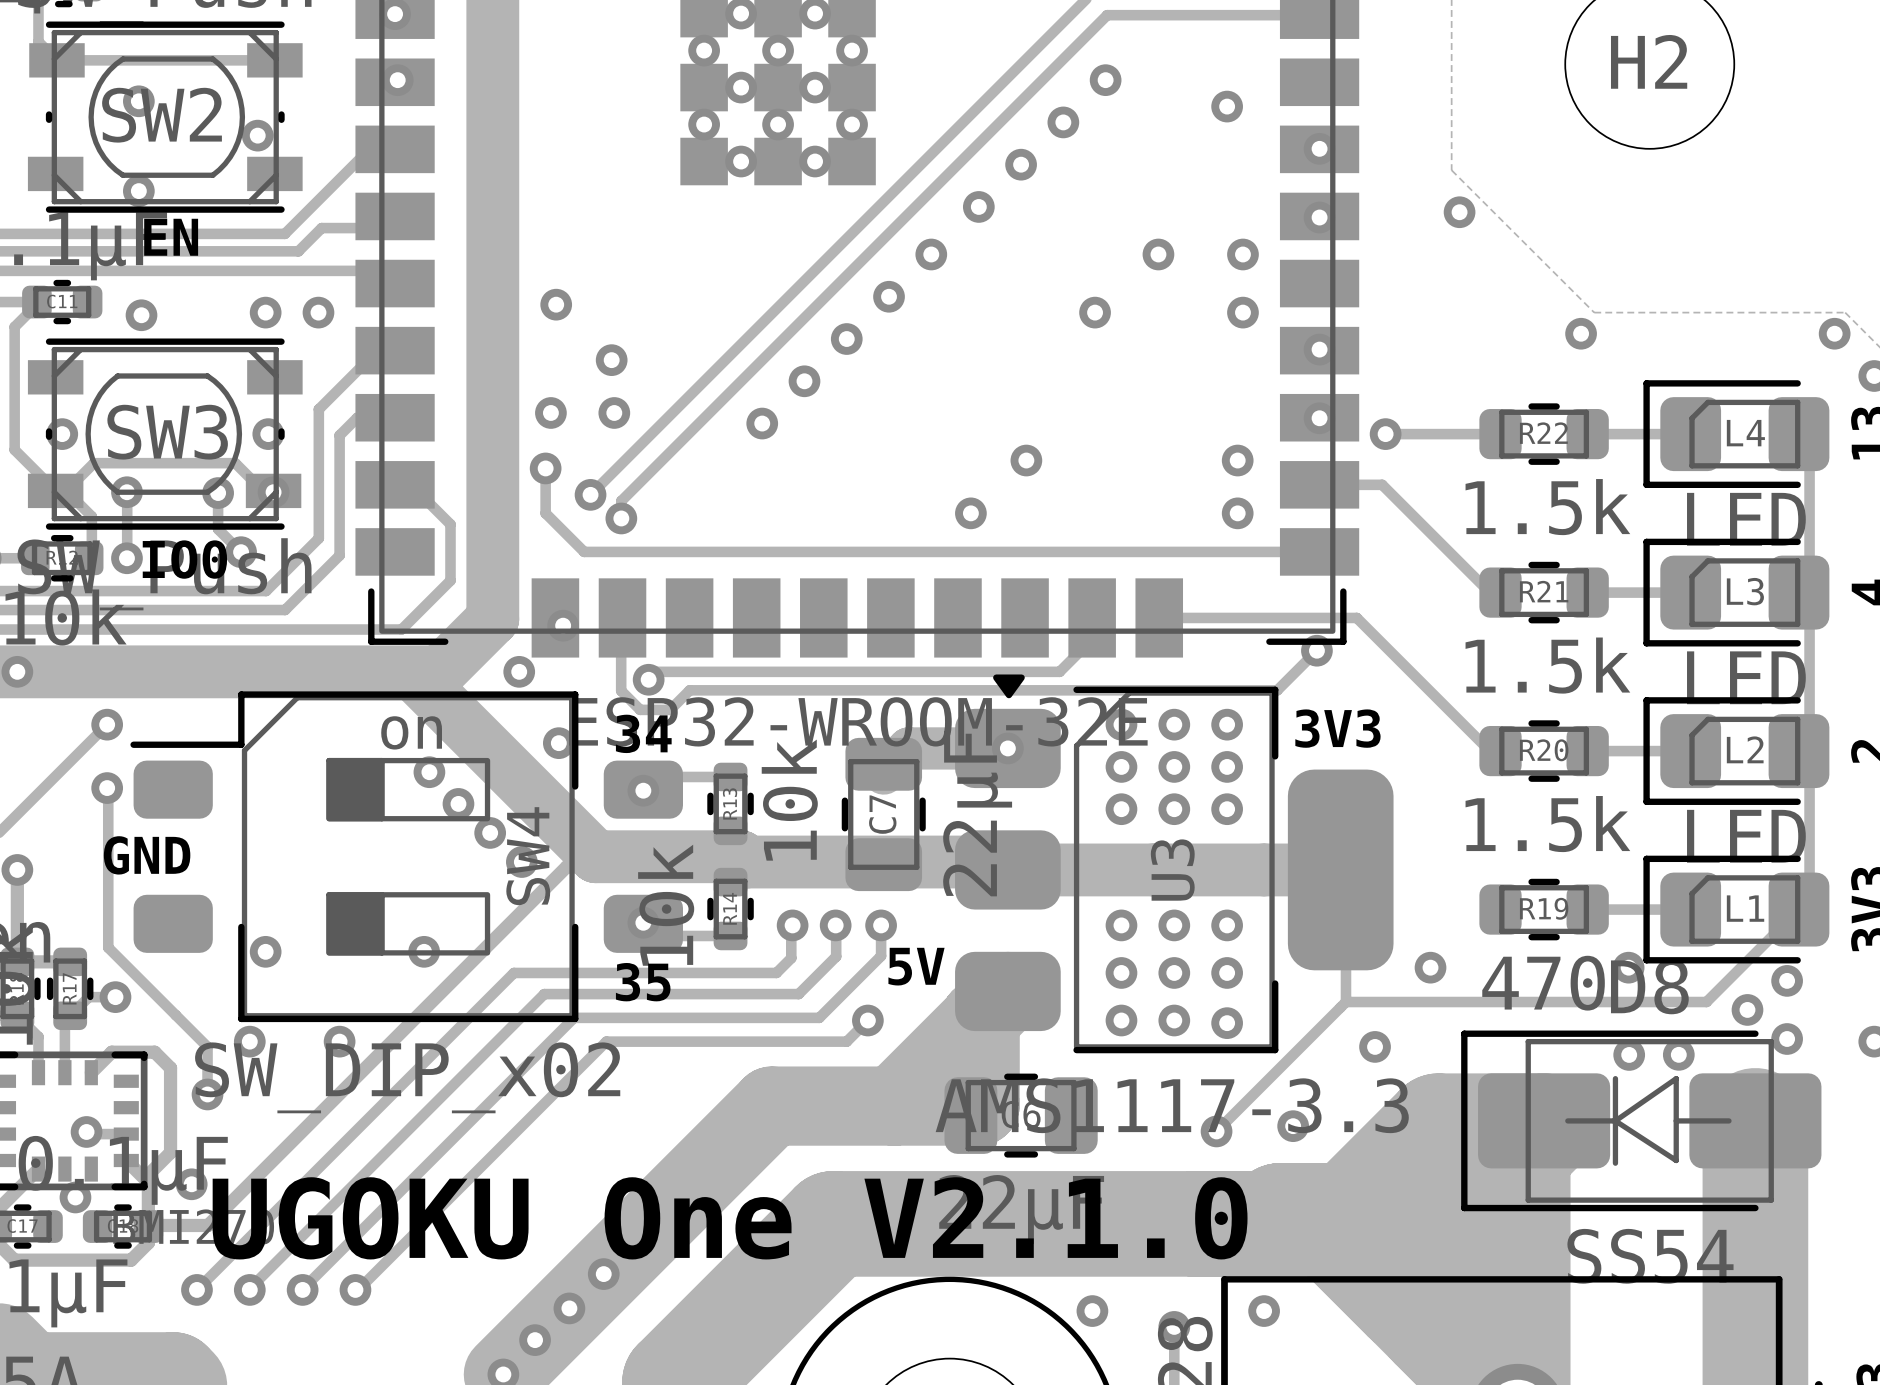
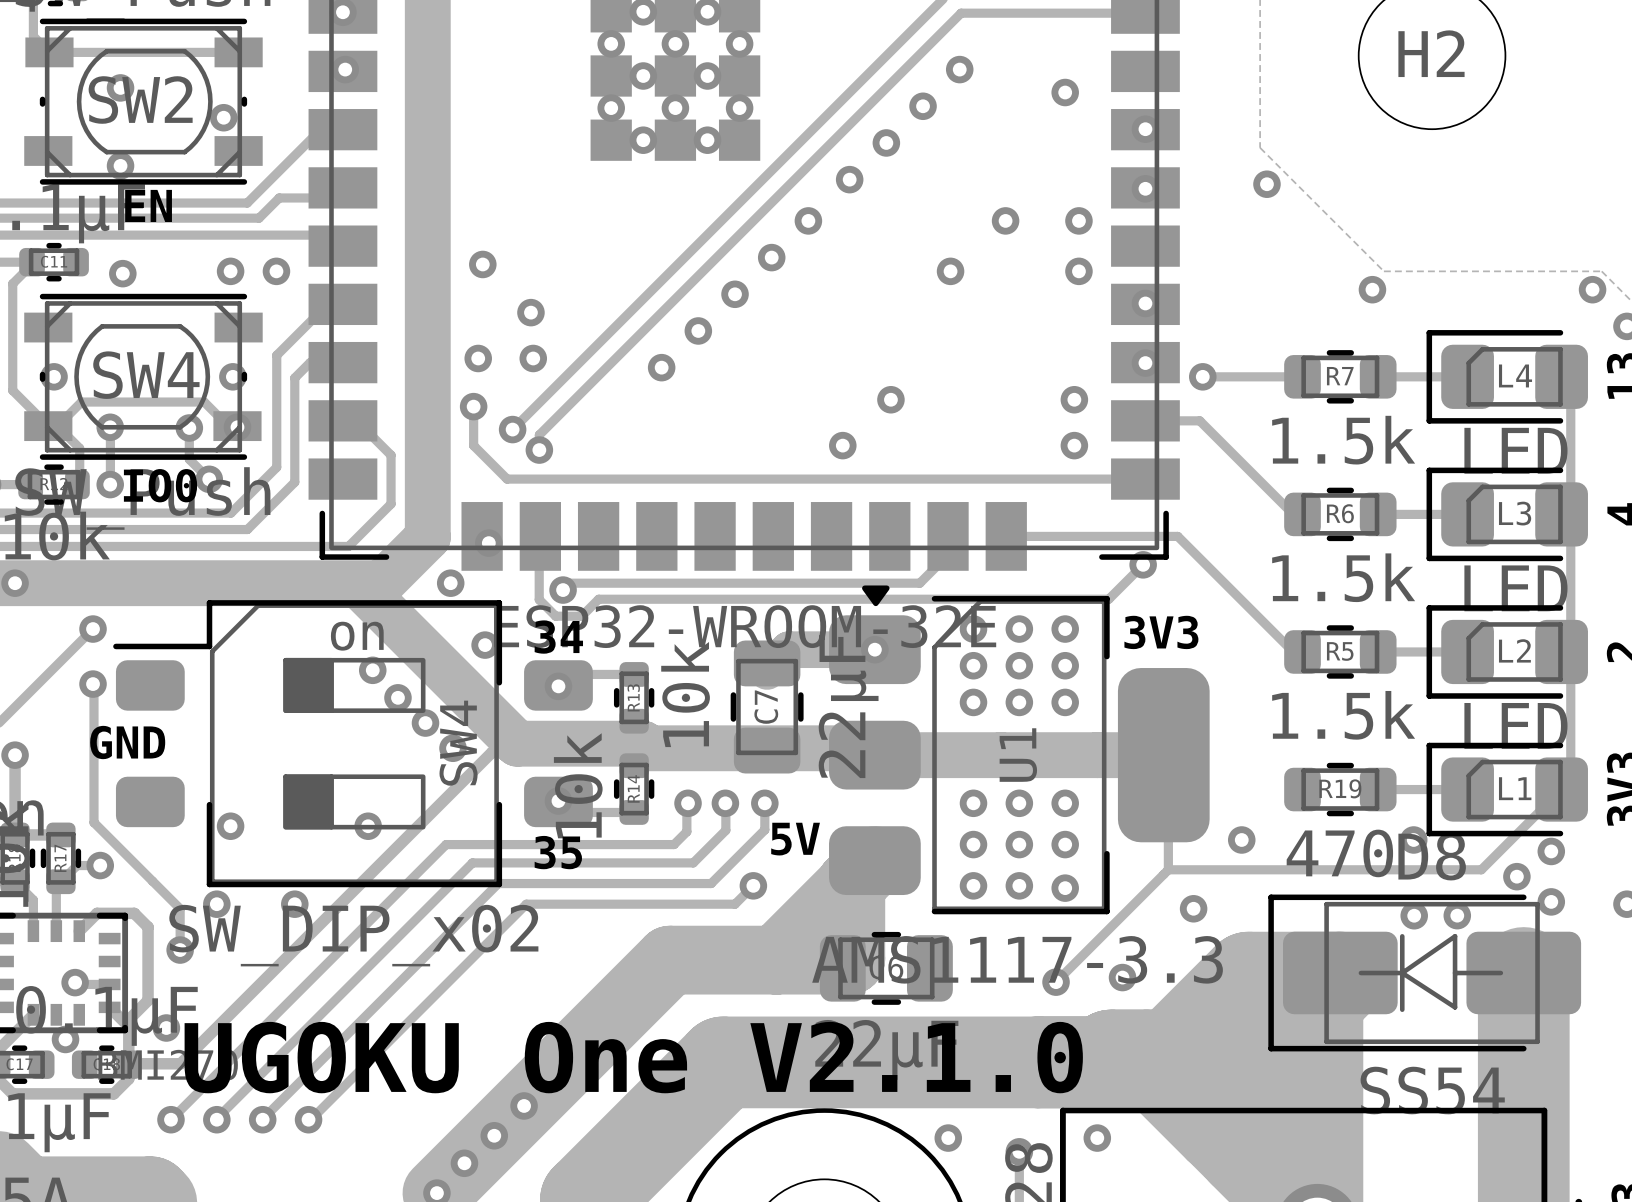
SW3 name: SW3 (167, 432) -> SW4 (146, 375)
R22 name: R22 (1543, 433) -> R7 (1340, 376)
R21 name: R21 (1544, 591) -> R6 (1340, 513)
R20 name: R20 (1544, 750) -> R5 (1340, 651)
U3 name: U3 (1172, 870) -> U1 (1018, 755)

